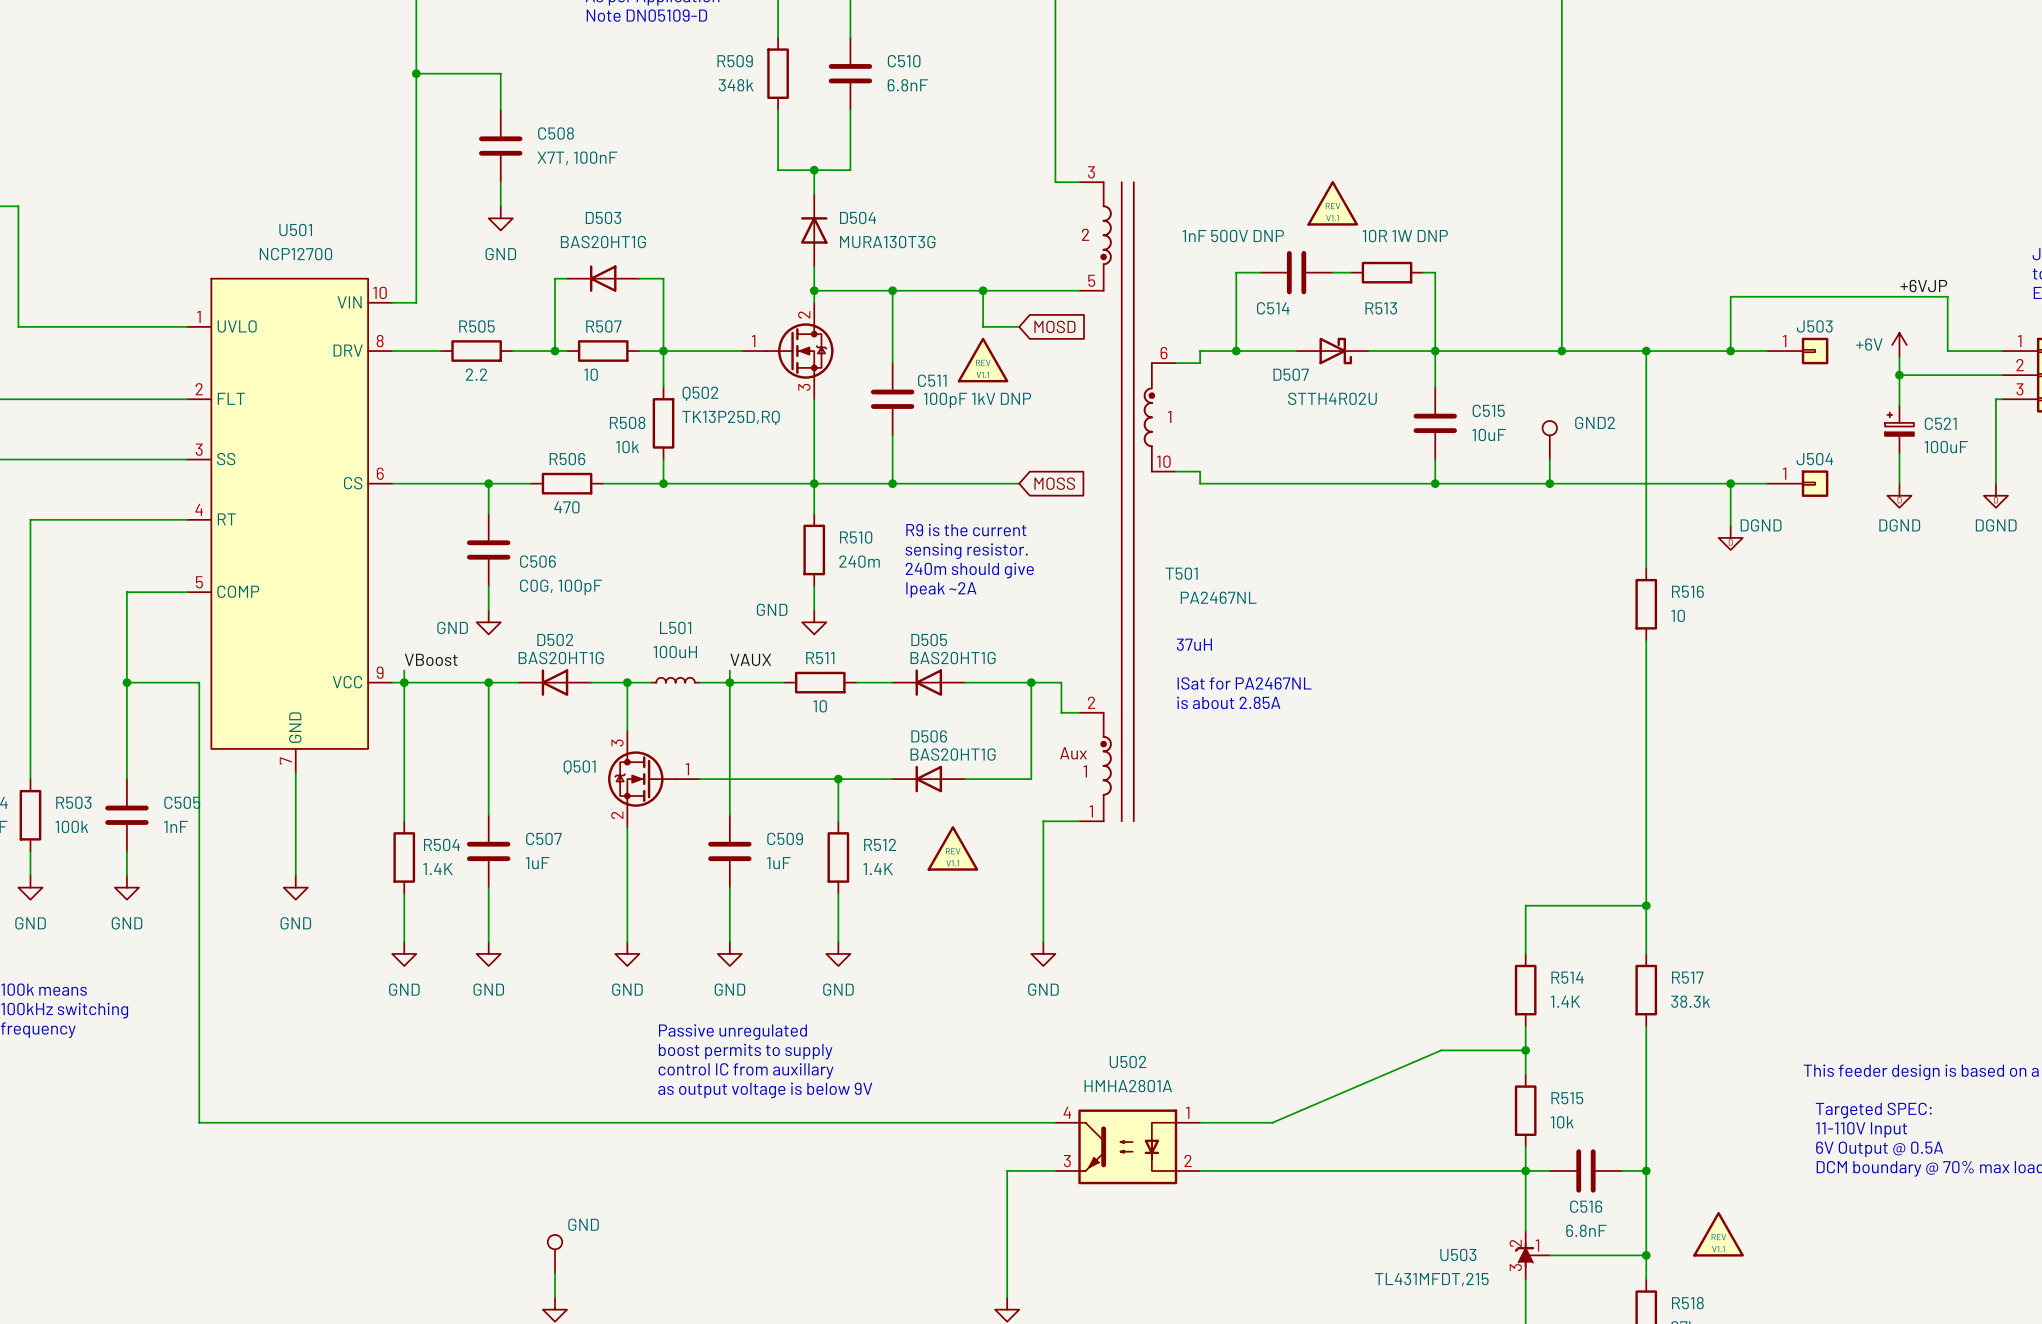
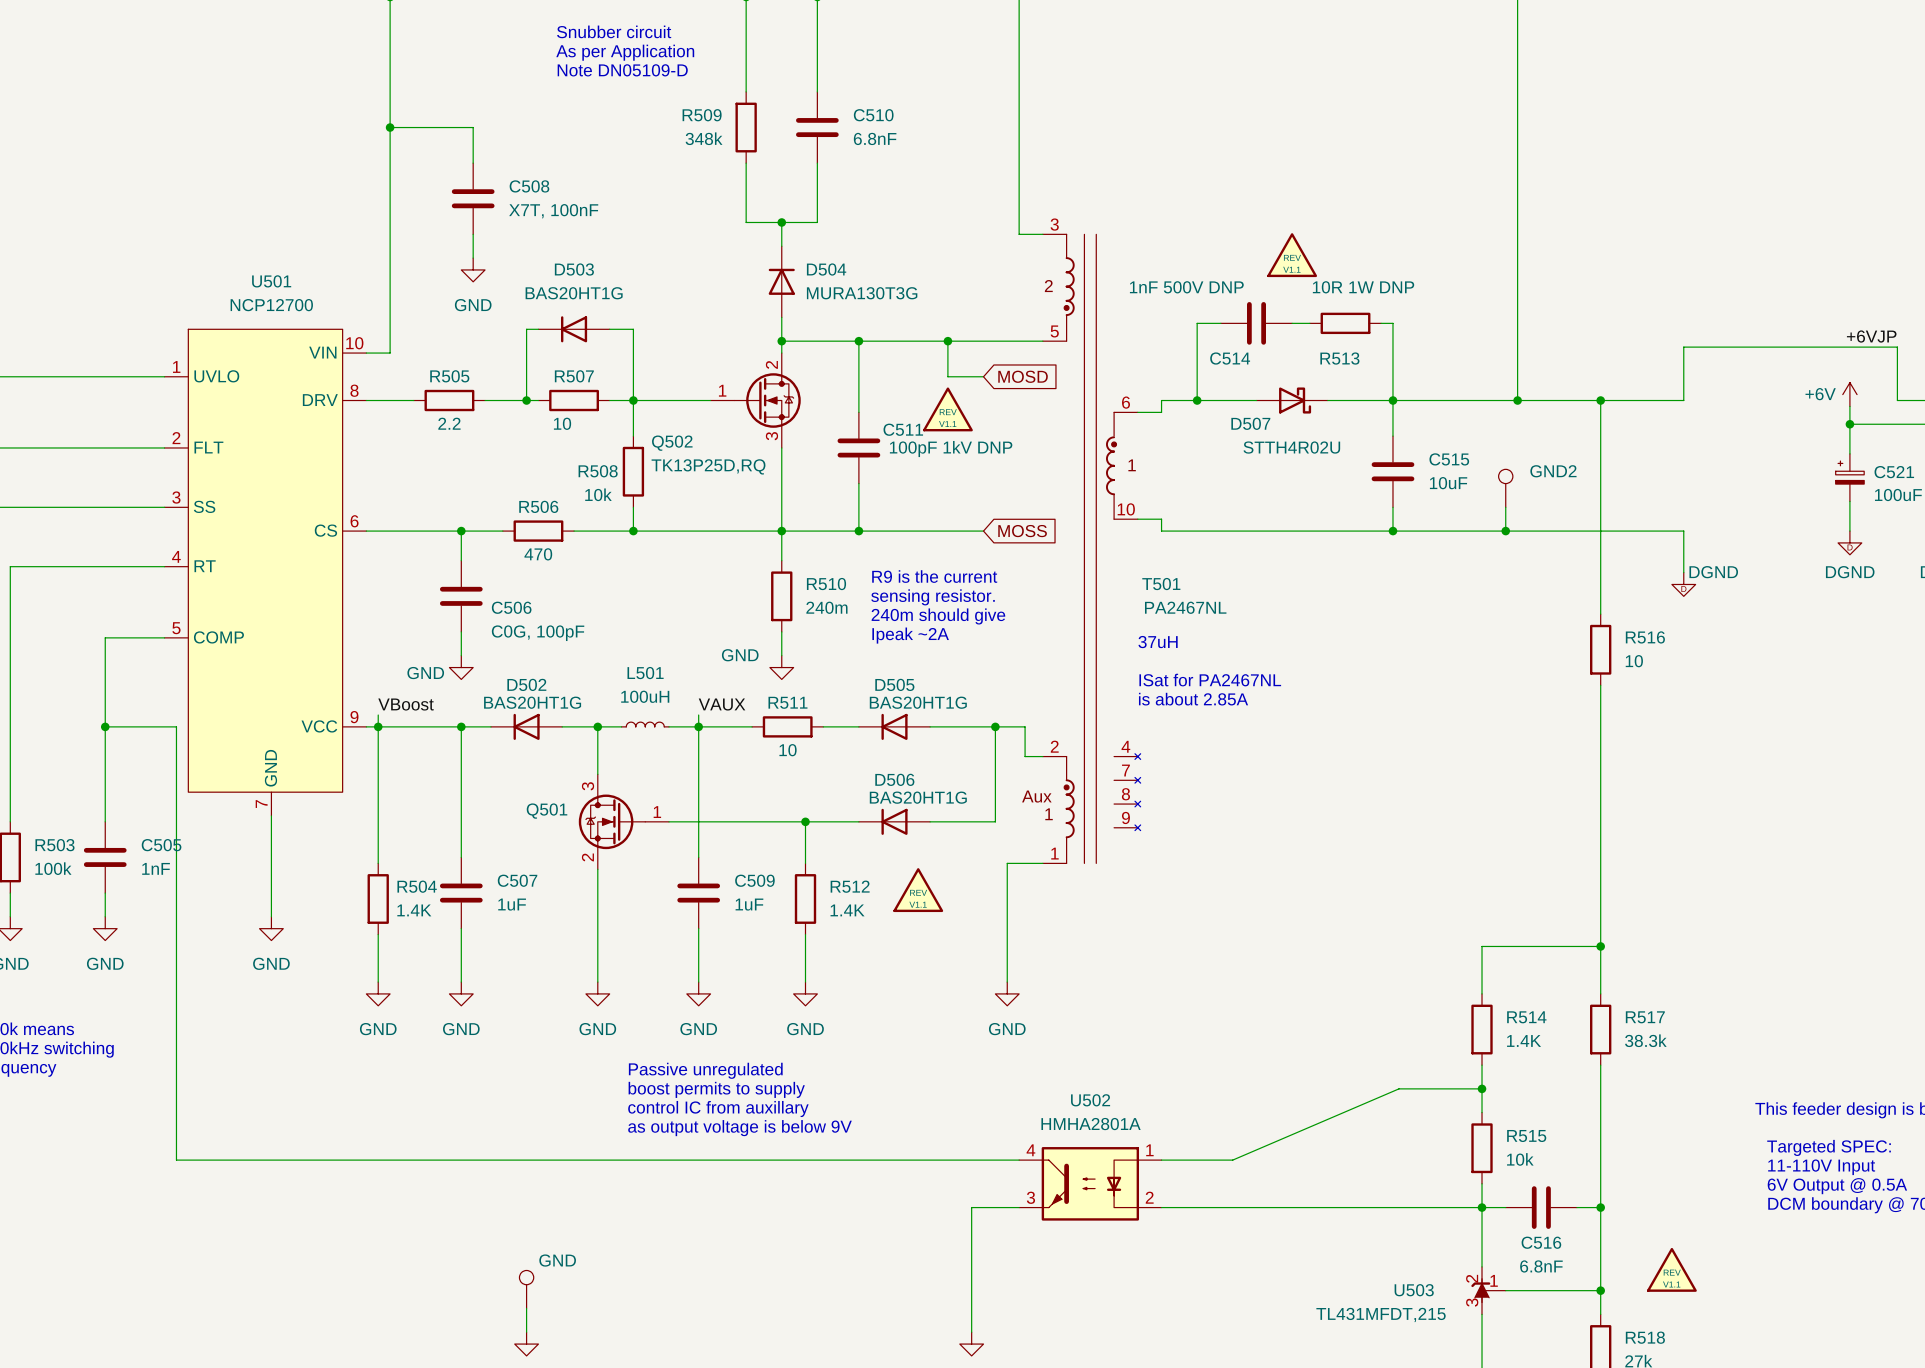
T501 symbol: [1079, 182, 1176, 822] -> [1042, 234, 1141, 864]
wire: (1730, 351) (1766, 351) -> none
junction: (1730, 351) -> none
J503: (1797, 351) -> none
wire: (1730, 483) (1766, 483) -> none
junction: (1730, 483) -> none
J504: (1797, 483) -> none
T501 name position: T501 (1181, 573) -> T501 (1161, 584)
T501 value position: PA2467NL (1218, 597) -> PA2467NL (1185, 607)
text position: 37uH (1194, 644) -> 37uH (1158, 642)
text position: ISat for PA2467NL (1244, 683) -> ISat for PA2467NL (1210, 680)
text position: is about 2.85A (1228, 702) -> is about 2.85A (1193, 699)

